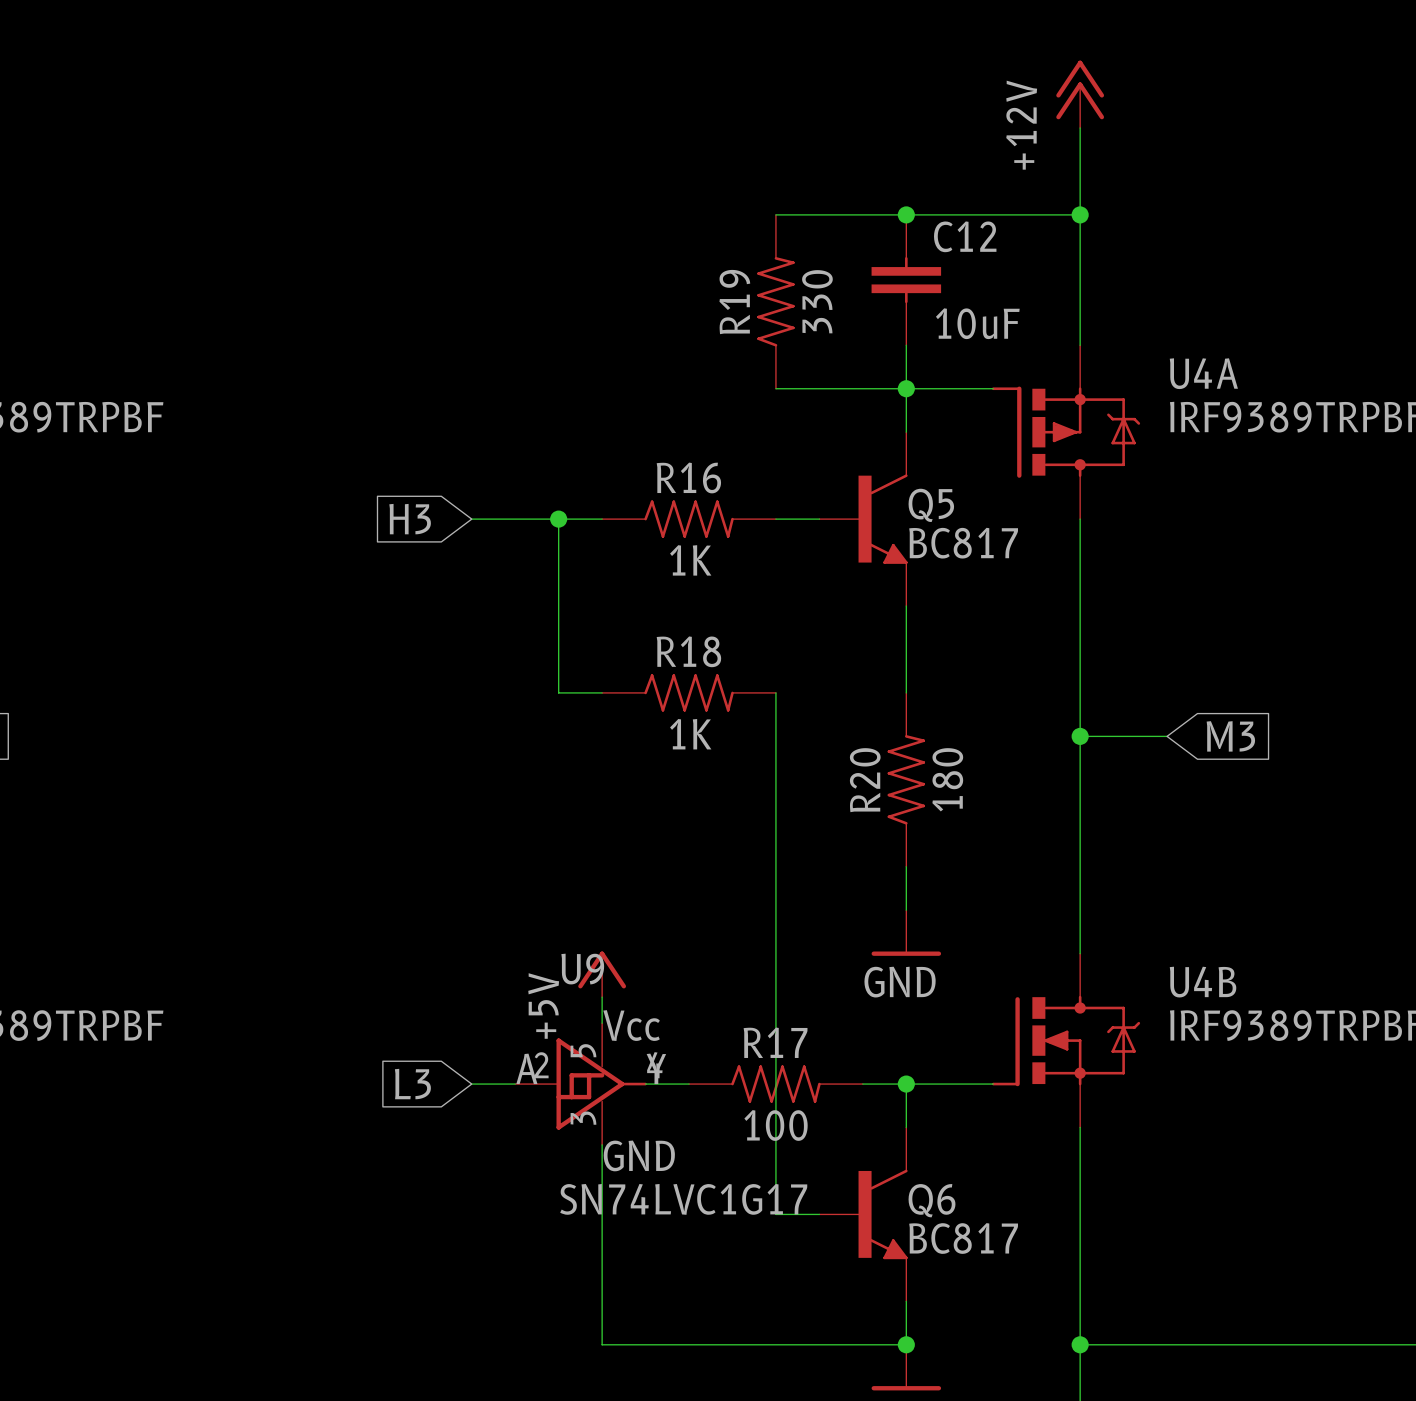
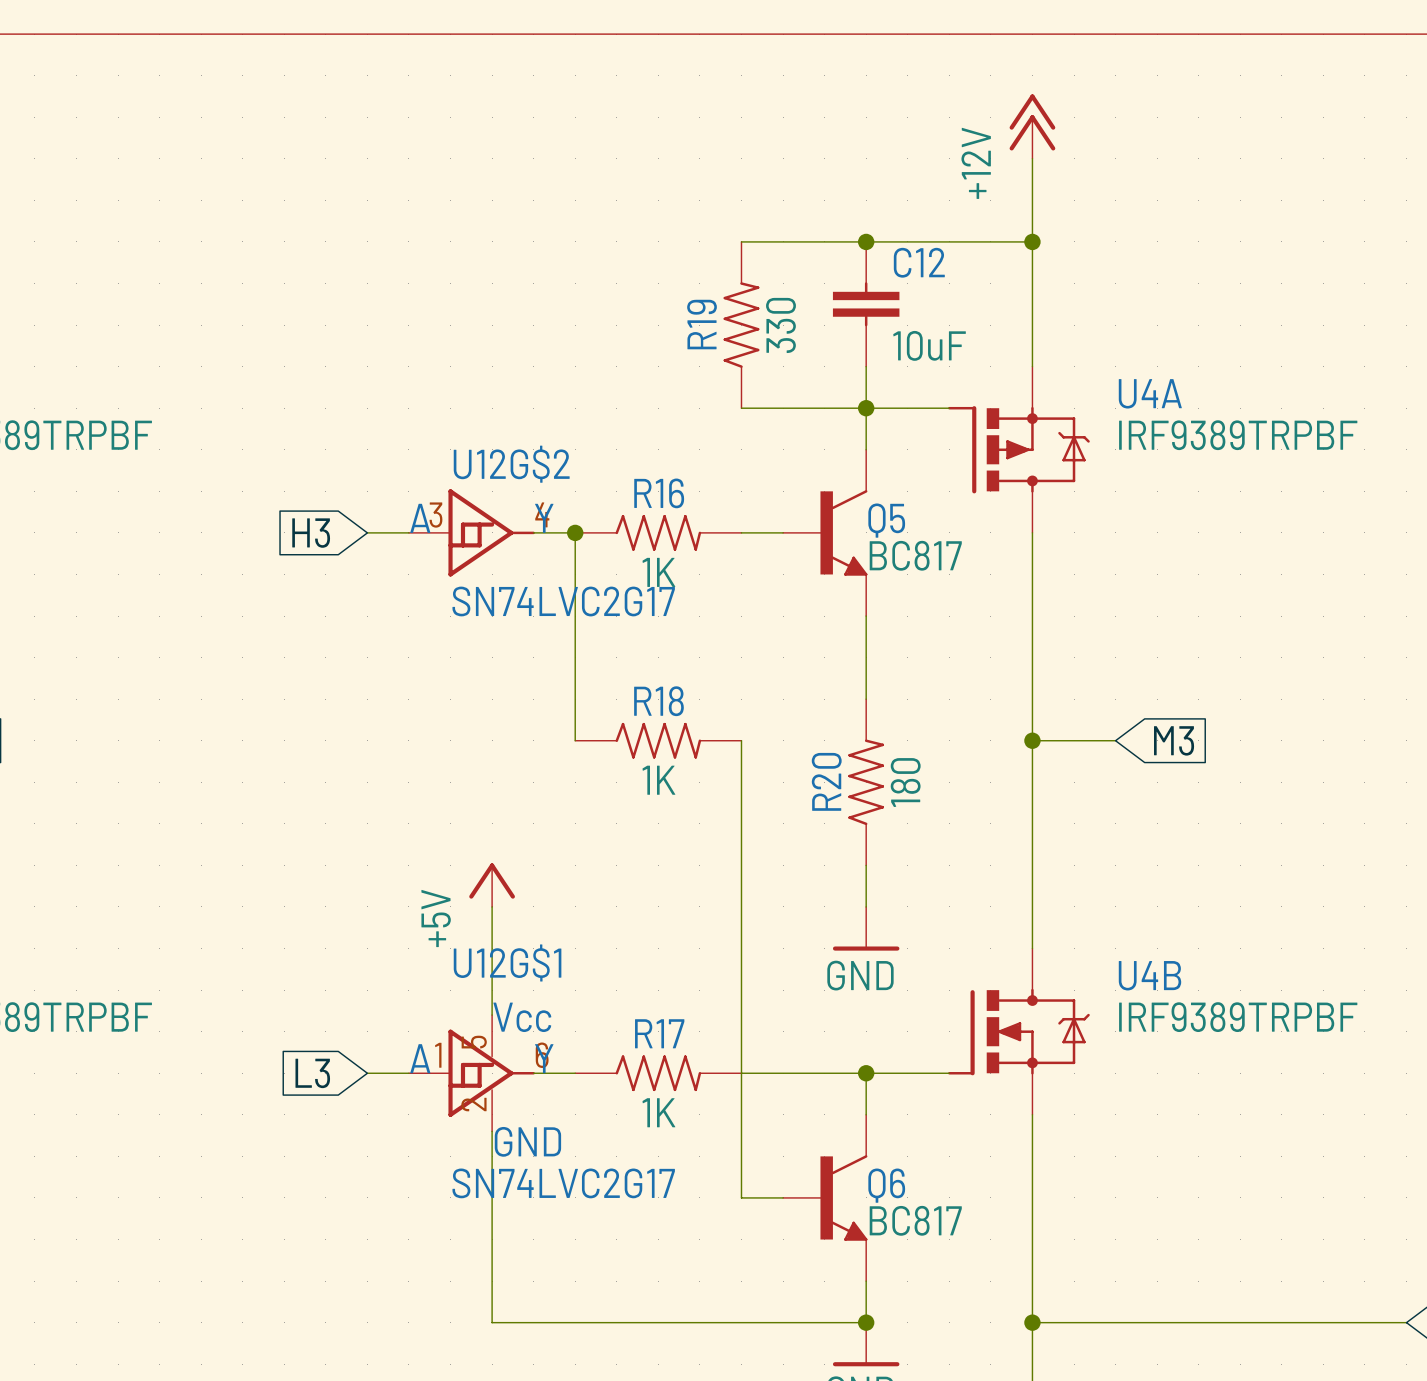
wire: none -> (367, 532) (408, 532)
global label position: H3 (410, 519) -> H3 (311, 533)
wire: (471, 519) (558, 519) (558, 692) (602, 692) -> none
U12G$2: none -> SN74LVC2G17 (471, 532)
junction position: (558, 519) -> (575, 532)
wire: none -> (575, 532) (575, 740)
R18 position: (689, 692) -> (658, 740)
wire: (775, 692) (775, 736) -> none
wire: none -> (492, 906) (492, 1015)
power symbol position: +5V (602, 974) -> +5V (492, 885)
wire: (602, 997) (602, 1023) -> none
global label position: L3 (412, 1084) -> L3 (312, 1073)
wire: (471, 1084) (515, 1084) -> (367, 1073) (408, 1073)
U12G$1: none -> SN74LVC2G17 (471, 1073)
U9: SN74LVC1G17 (581, 1084) -> none
wire: (645, 1084) (689, 1084) -> (533, 1073) (575, 1073)
R17 position: (775, 1084) -> (658, 1073)
R17 value: 100 (776, 1125) -> 1K (658, 1112)
wire: (602, 1144) (602, 1344) -> (492, 1131) (492, 1322) (575, 1322)

